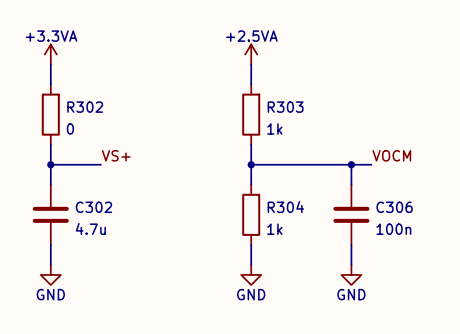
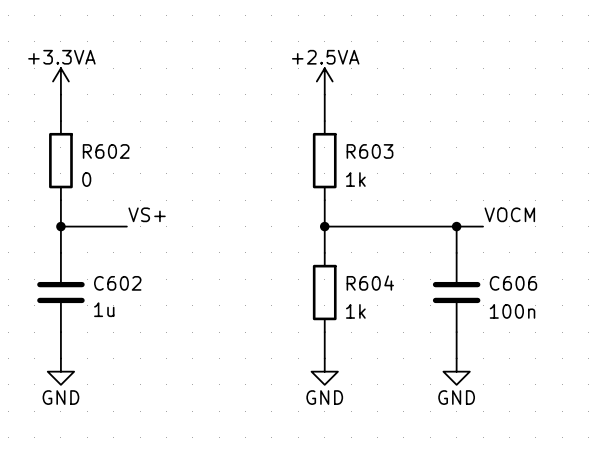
R302 name: R302 (85, 107) -> R602 (106, 151)
R303 name: R303 (285, 107) -> R603 (369, 151)
C302 name: C302 (93, 207) -> C602 (117, 283)
R304 name: R304 (285, 207) -> R604 (370, 283)
C306 name: C306 (394, 207) -> C606 (513, 283)
C302 value: 4.7u (90, 228) -> 1u (104, 309)

